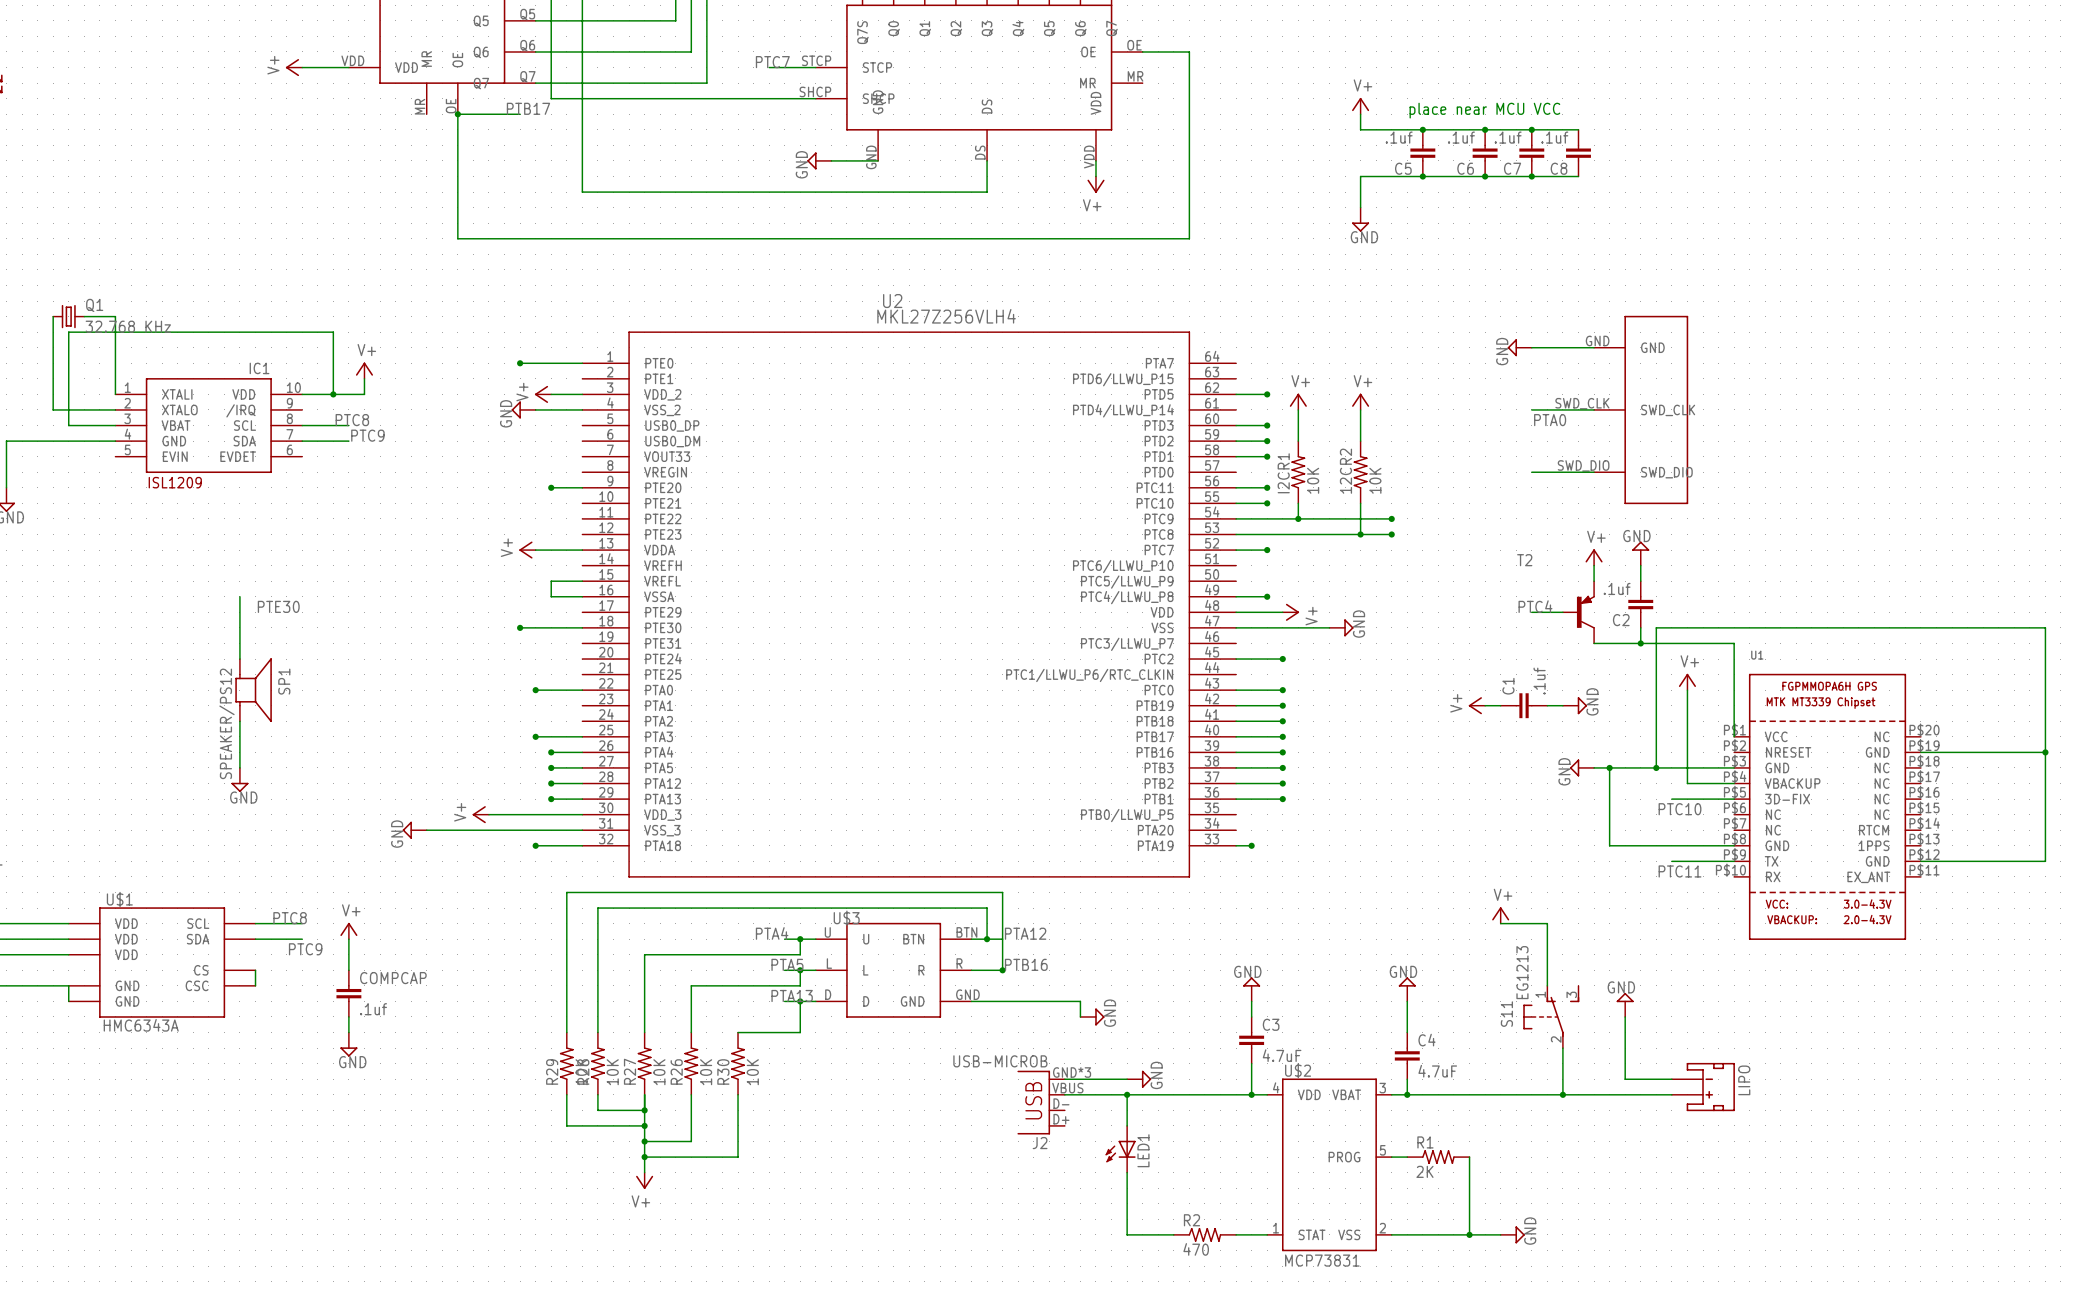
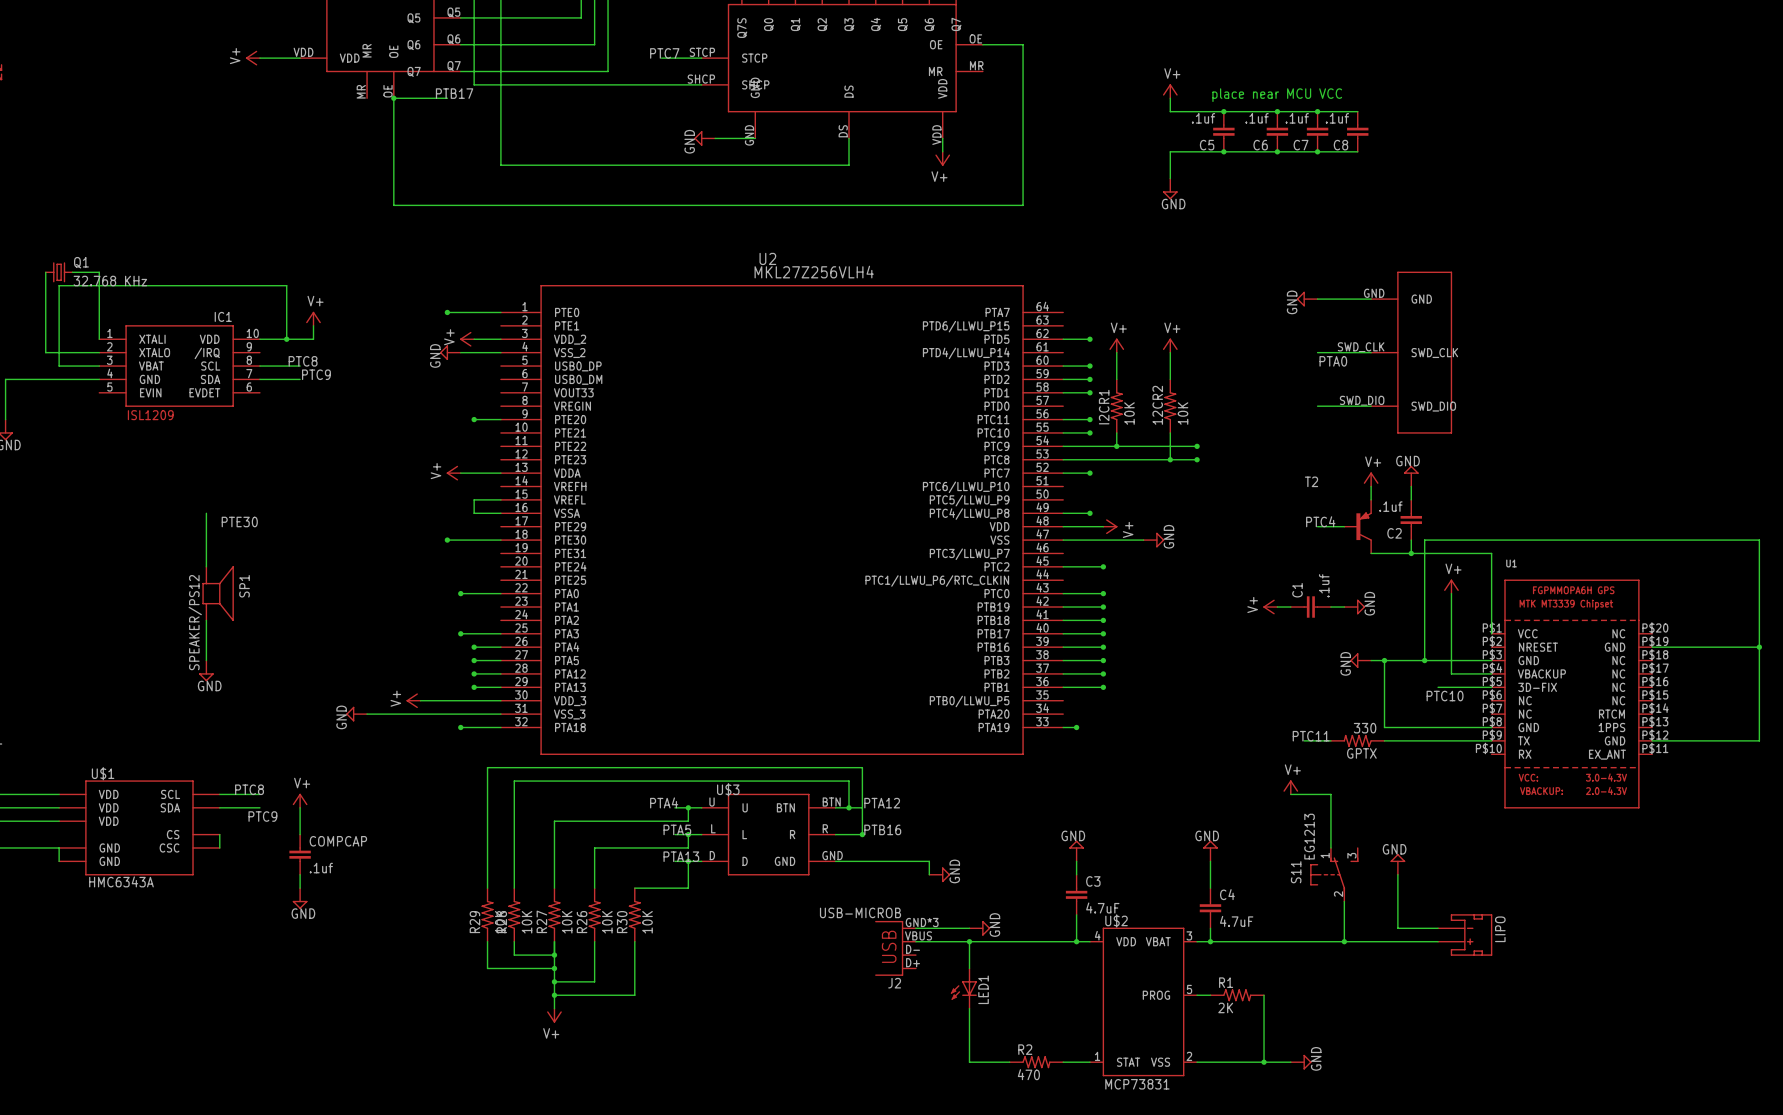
label: none -> PTC11 (1311, 736)
wire: none -> (1304, 740) (1330, 740)
GPTX: none -> 330 (1357, 740)
wire: none -> (1384, 740) (1438, 740)
label: PTC11 (1680, 871) -> none

